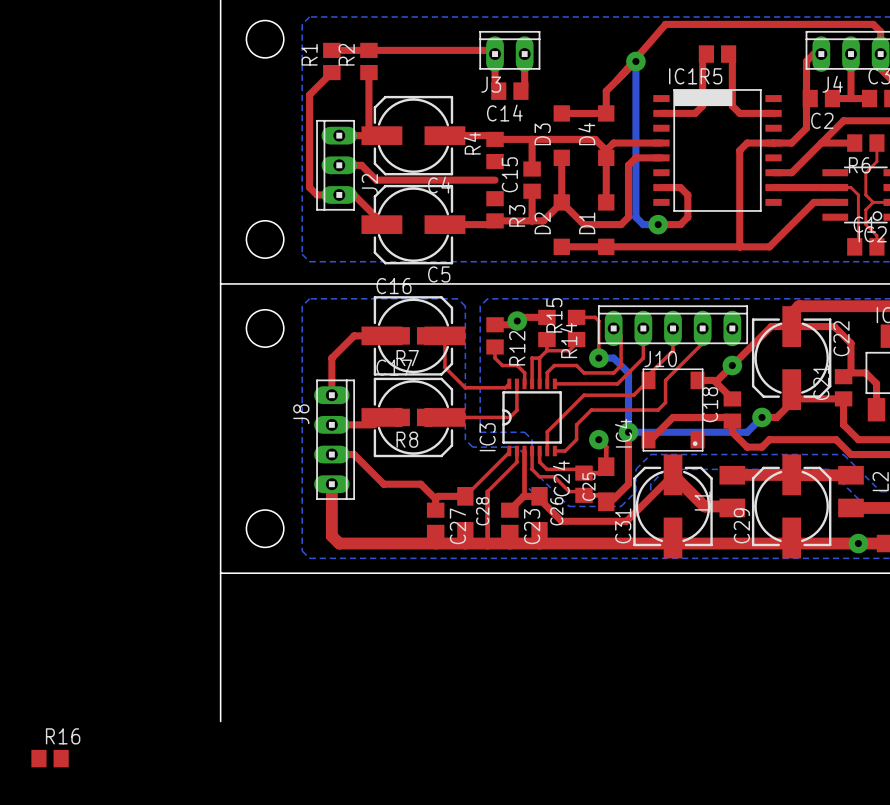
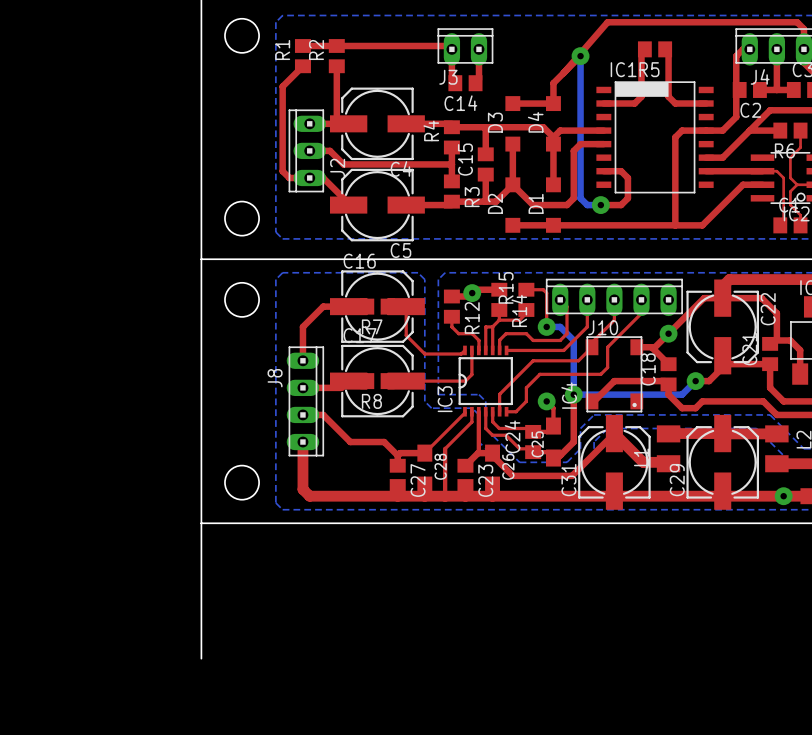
top track: none -> (451, 147) (451, 181)
R16: (50, 758) -> none

